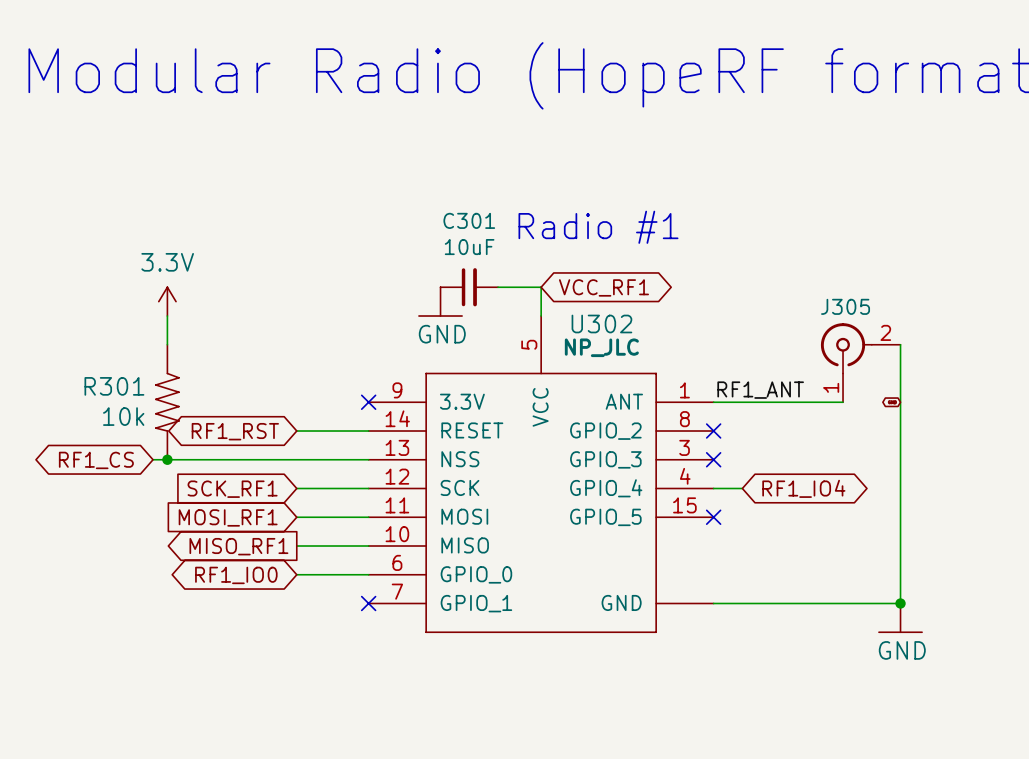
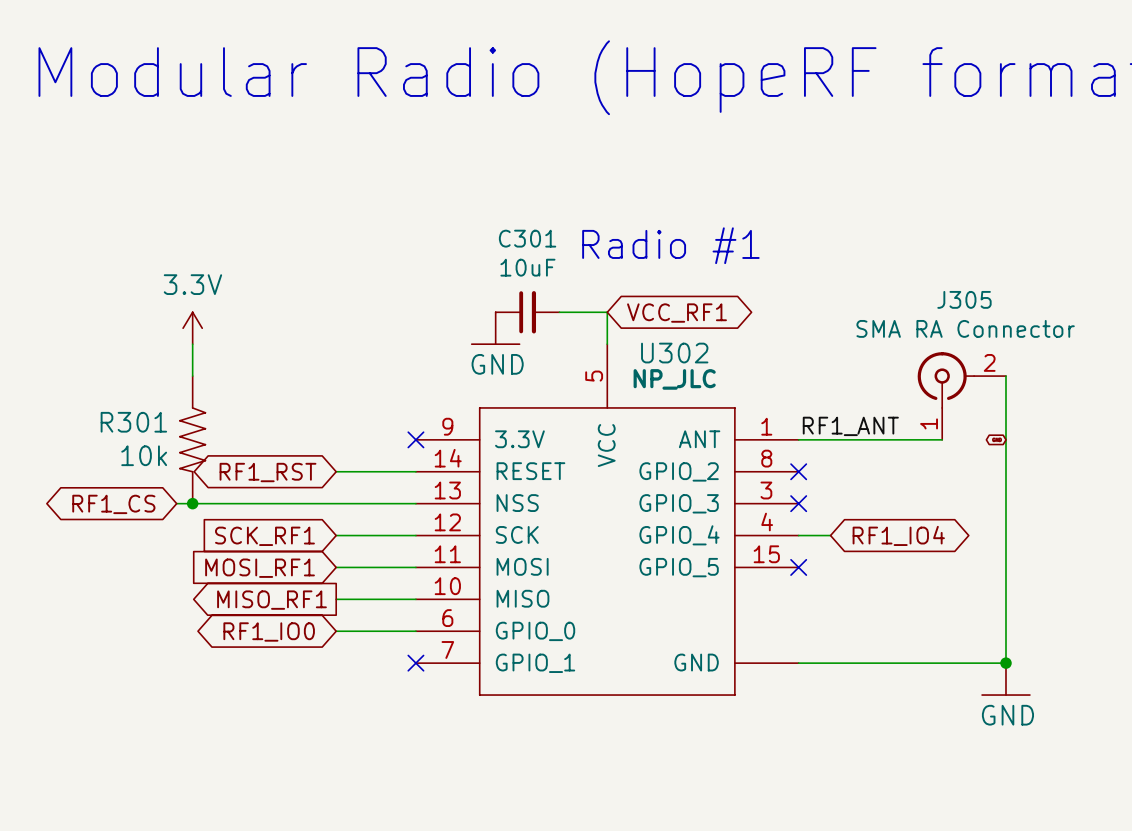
J305 value: none -> SMA RA Connector (965, 328)
J305 name position: J305 (845, 306) -> J305 (964, 299)

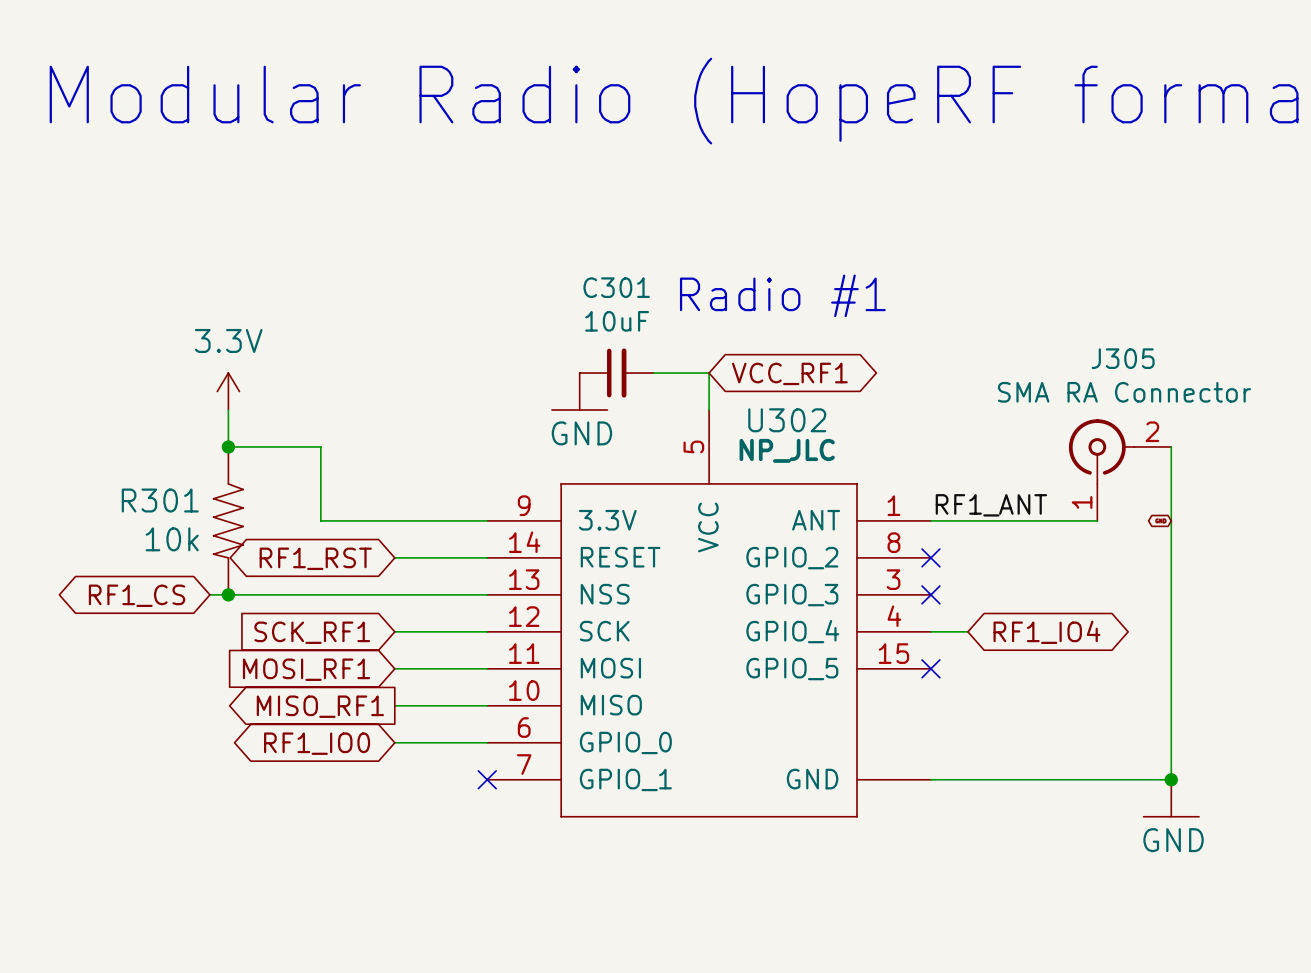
wire: none -> (228, 446) (320, 446) (320, 520) (487, 520)
junction: none -> (228, 446)
no-connect mark: (415, 439) -> none

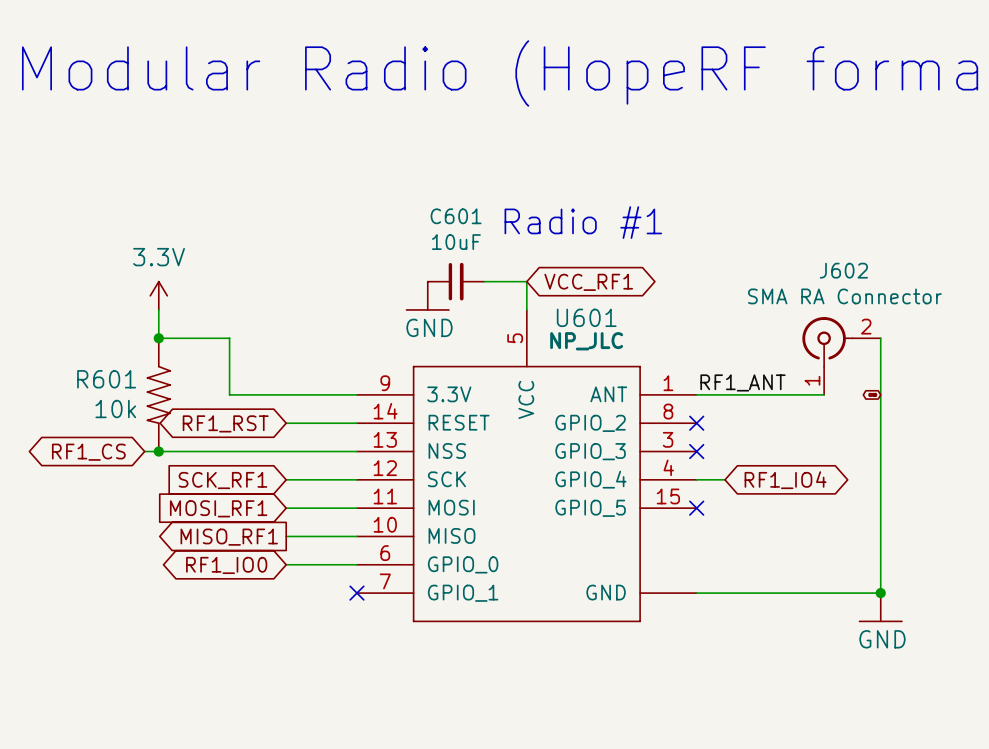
C301 name: C301 (616, 287) -> C601 (456, 216)
J305 name: J305 (1123, 358) -> J602 (843, 270)
U302 name: U302 (787, 420) -> U601 (586, 317)
R301 name: R301 (160, 500) -> R601 (106, 379)

